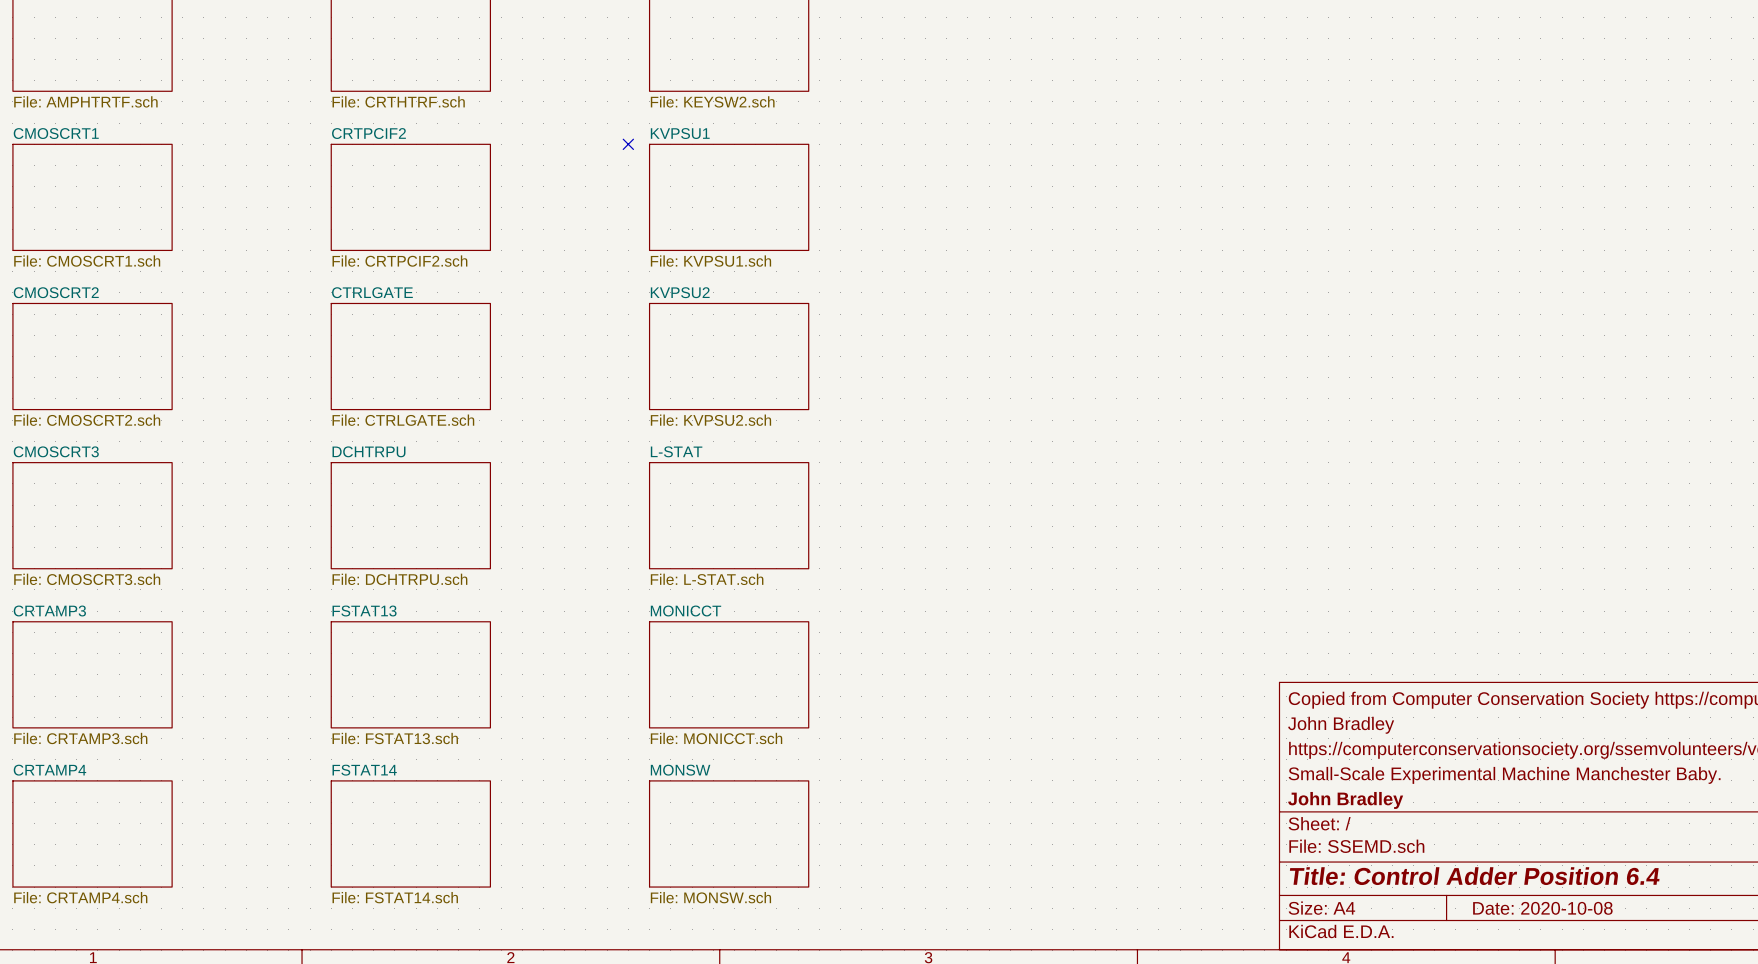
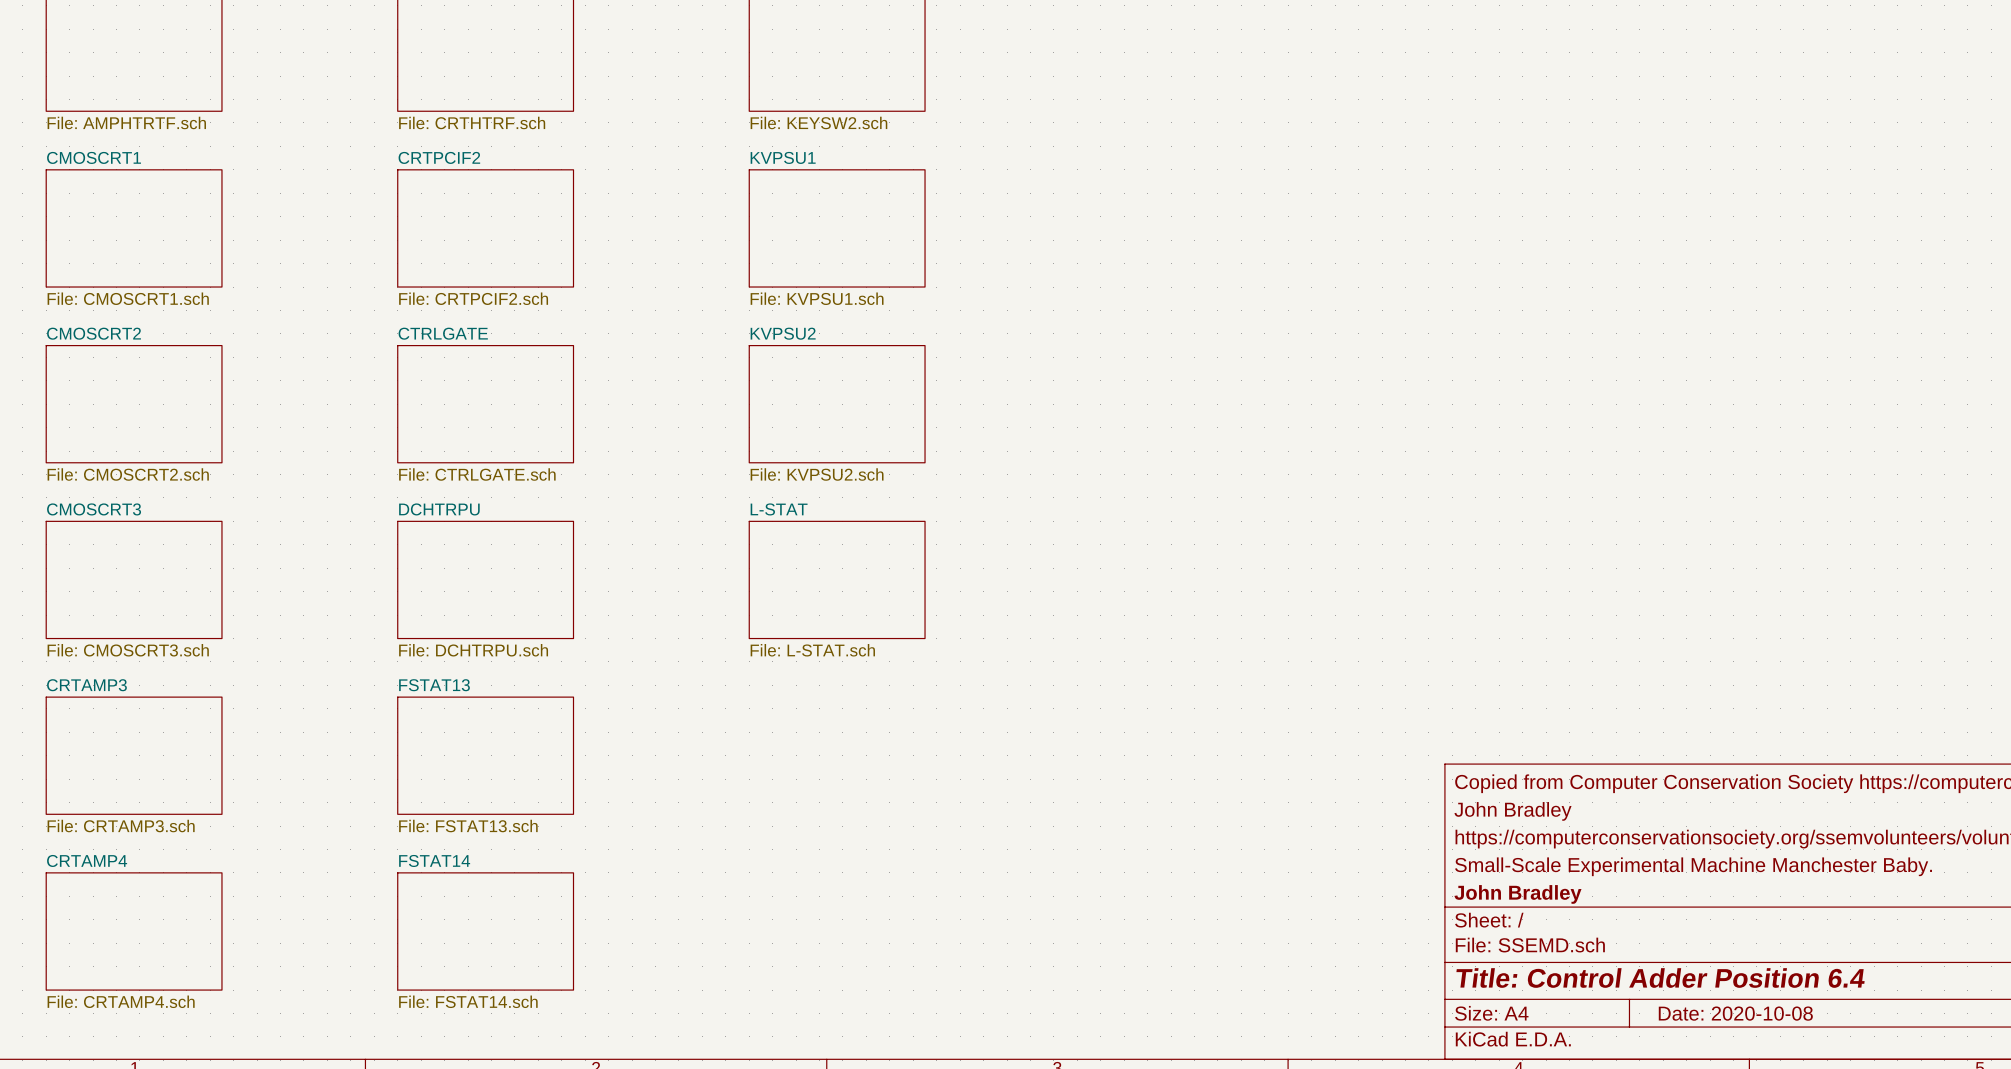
no-connect mark: (628, 144) -> none
sheet MONICCT: File: MONICCT.sch (729, 674) -> none
sheet MONSW: File: MONSW.sch (729, 833) -> none

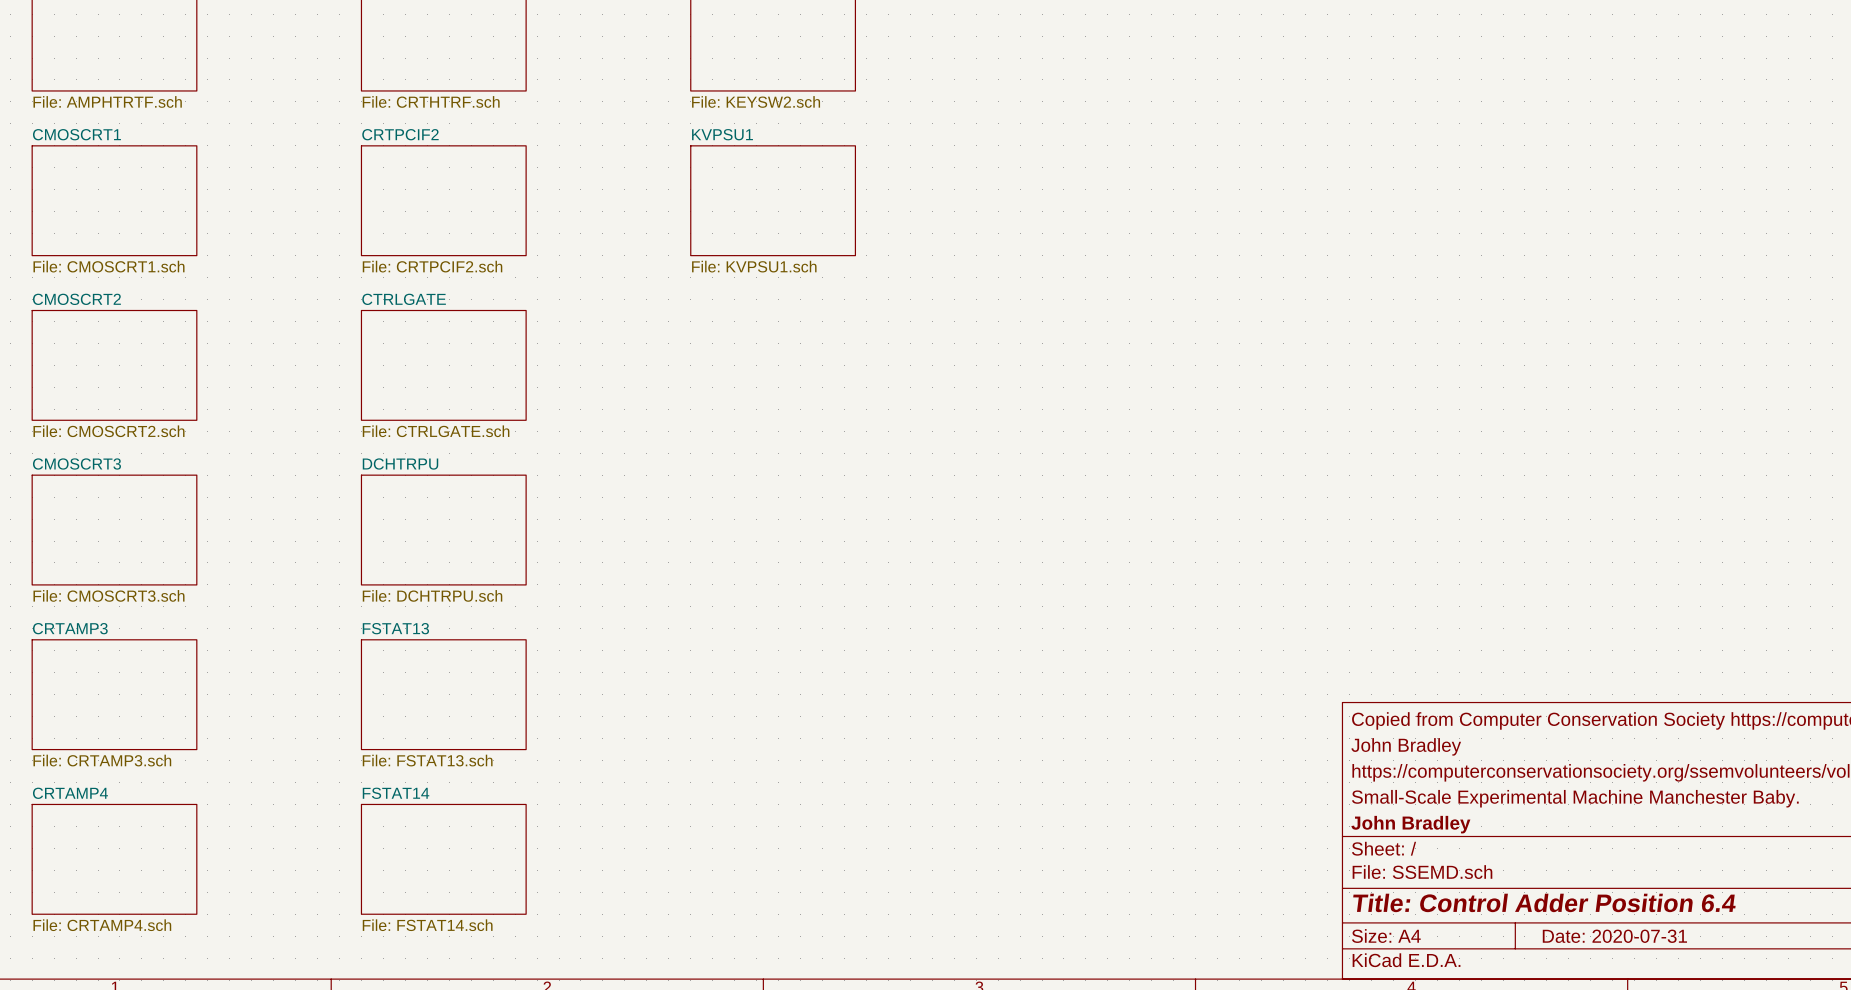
sheet KVPSU2: File: KVPSU2.sch (837, 404) -> none
sheet L-STAT: File: L-STAT.sch (837, 579) -> none
title block: Date: 2020-10-08 (1735, 1013) -> Date: 2020-07-31 (1614, 936)

